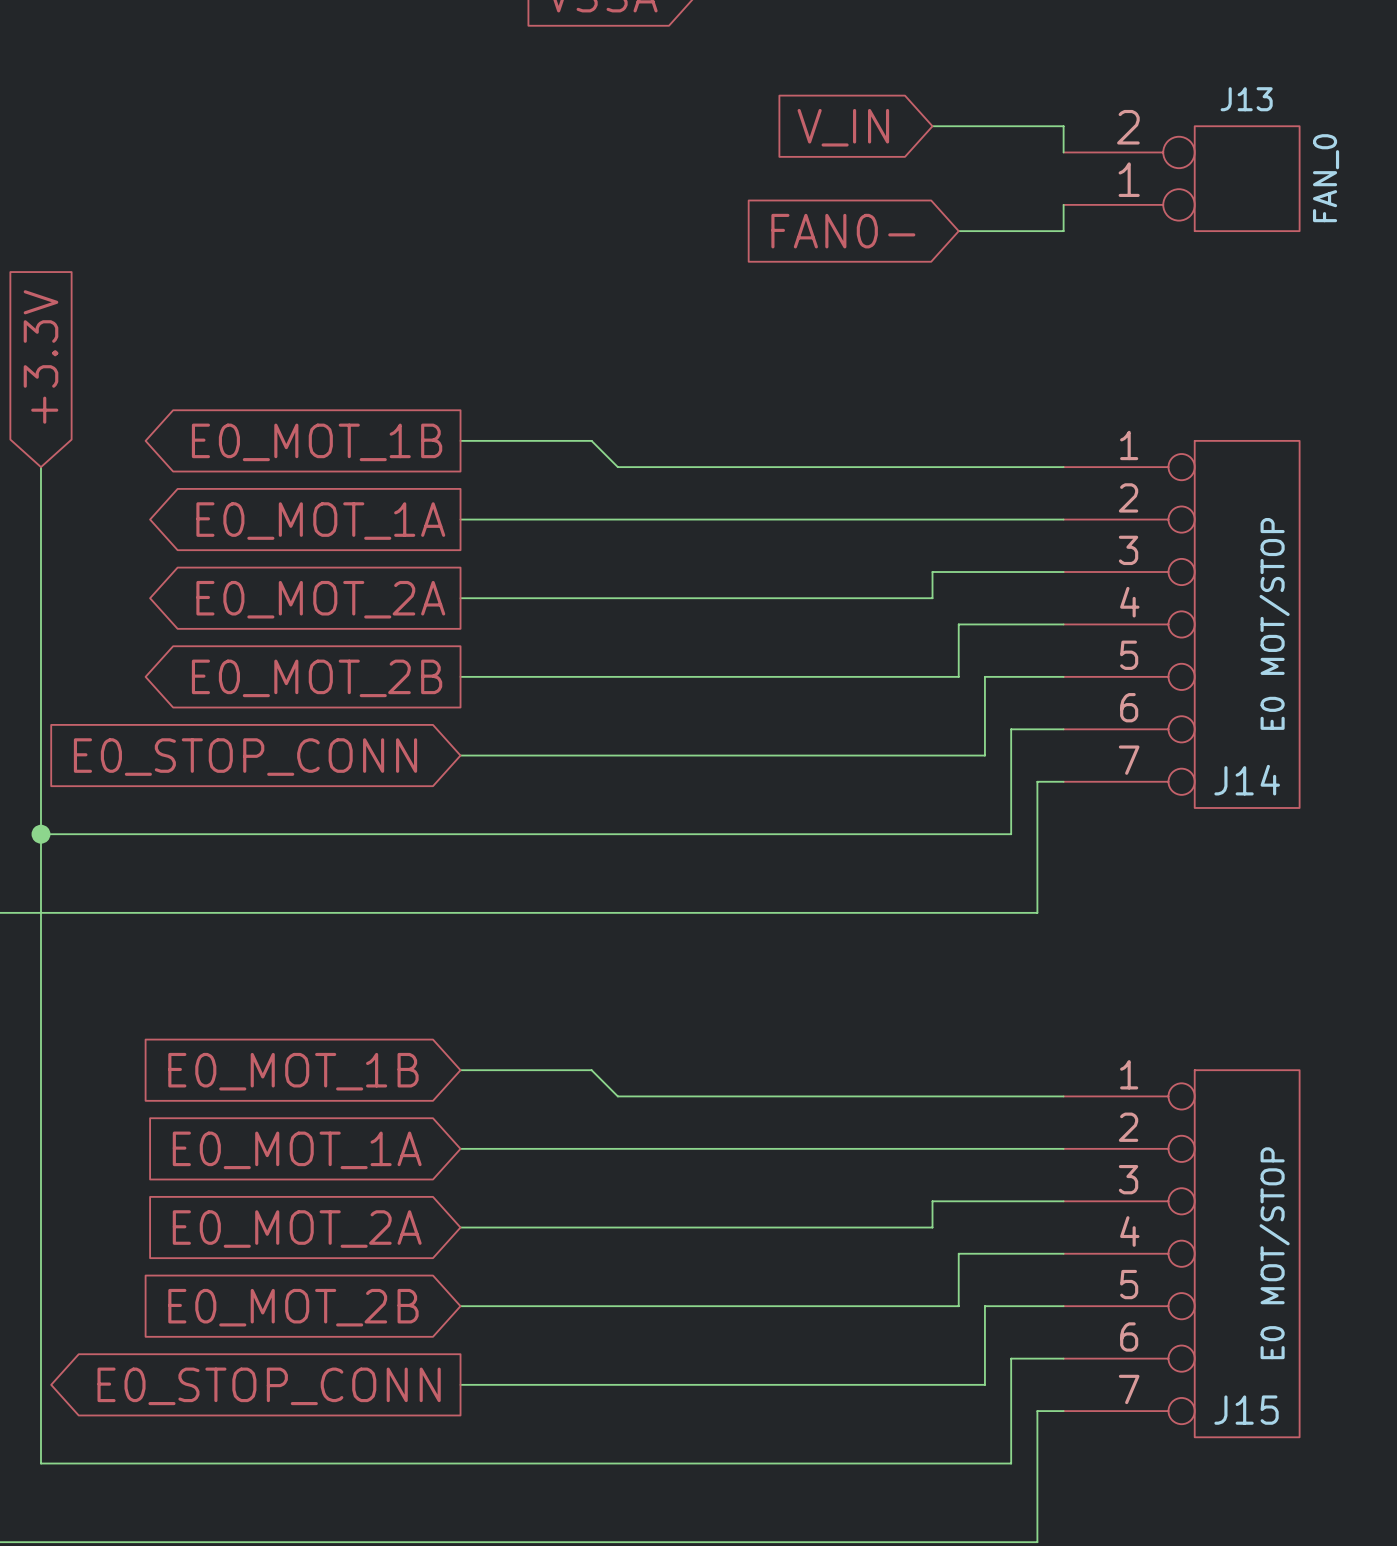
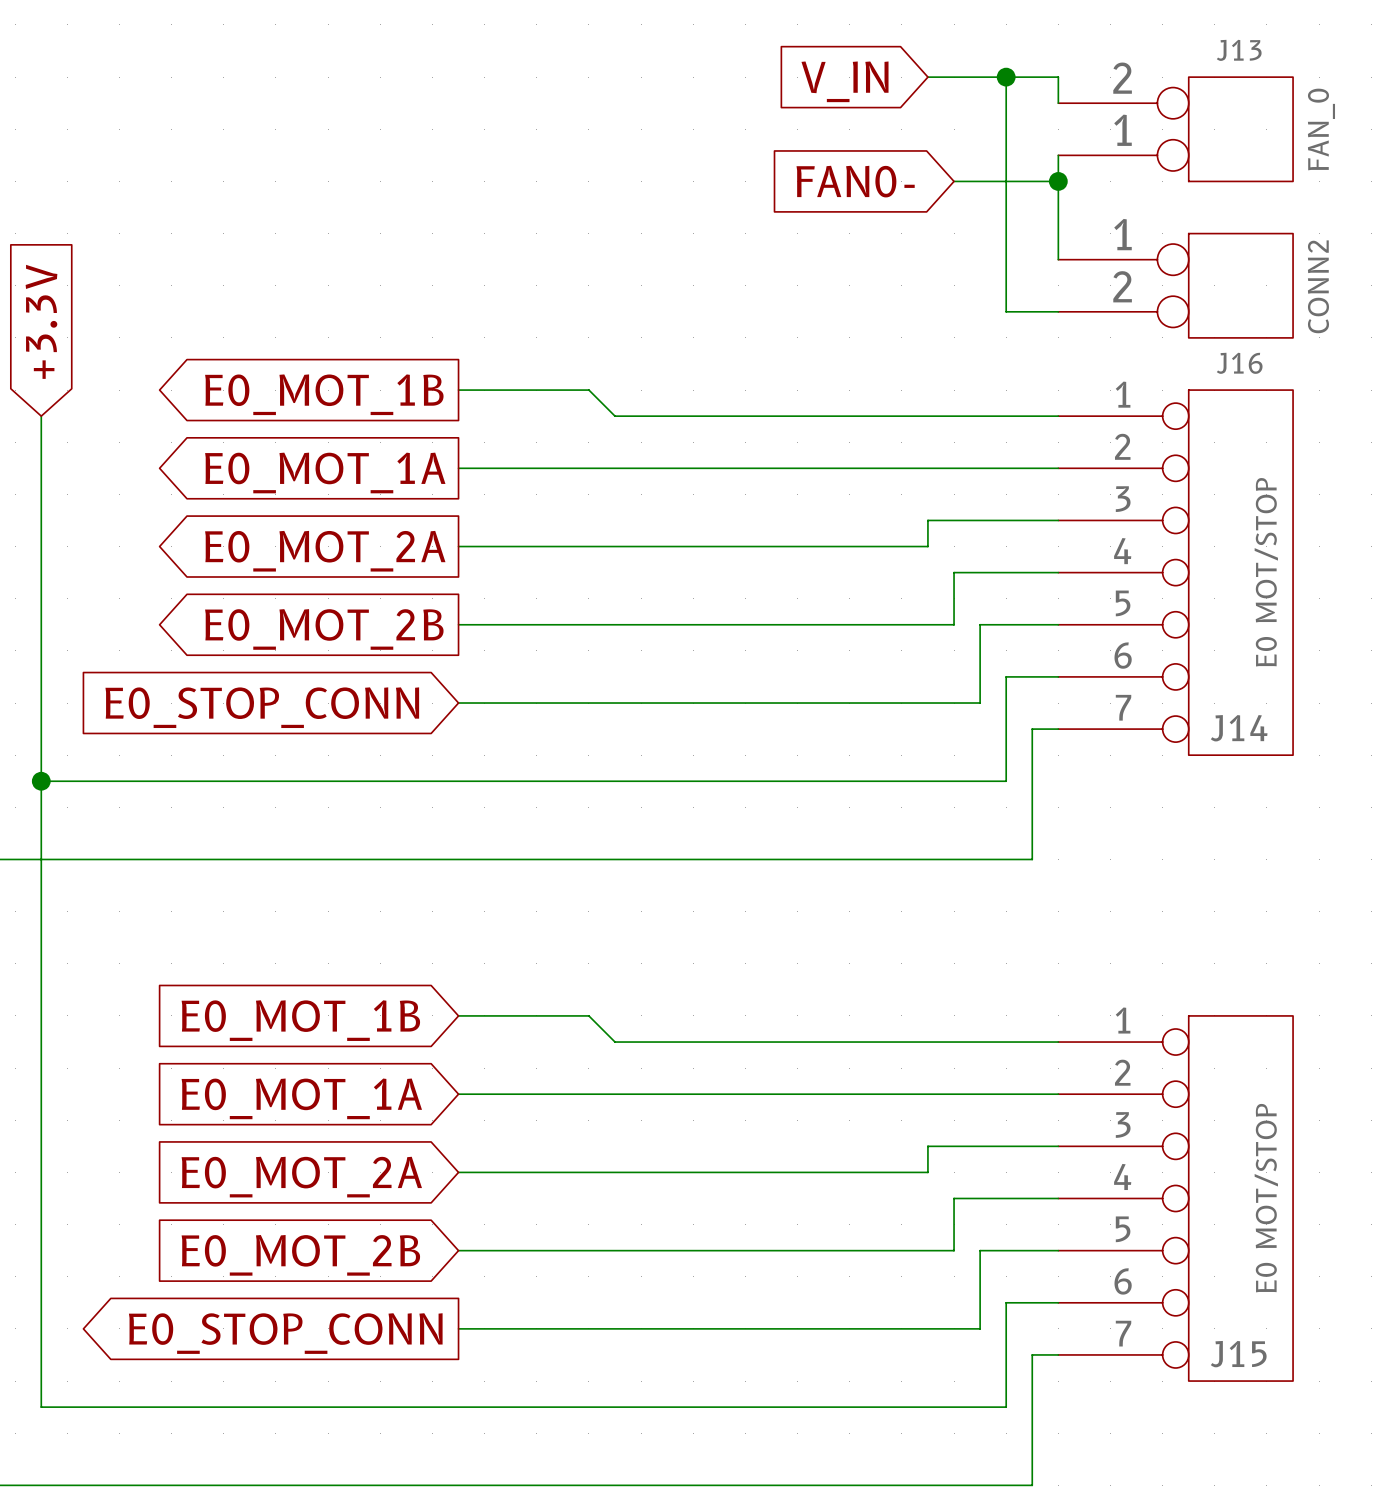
wire: none -> (1006, 77) (1006, 311) (1058, 311)
junction: none -> (1006, 77)
wire: none -> (1058, 181) (1058, 259)
junction: none -> (1058, 181)
J16: none -> CONN2 (1175, 285)

